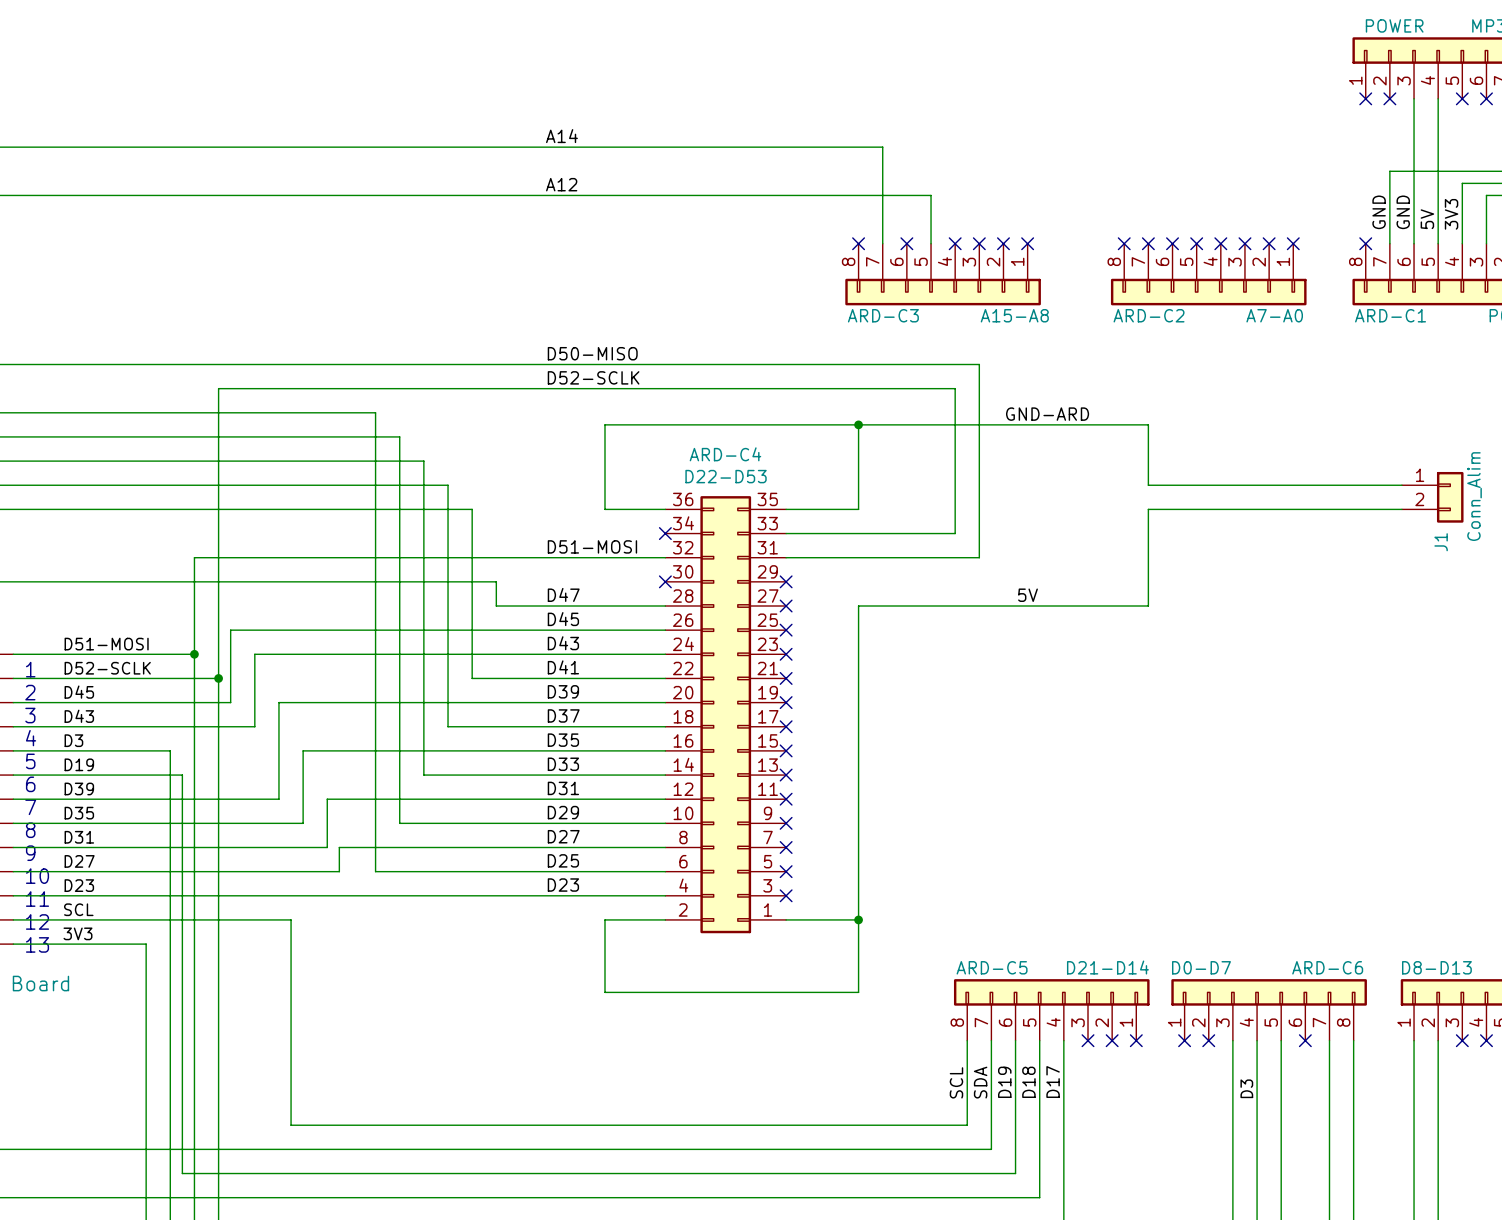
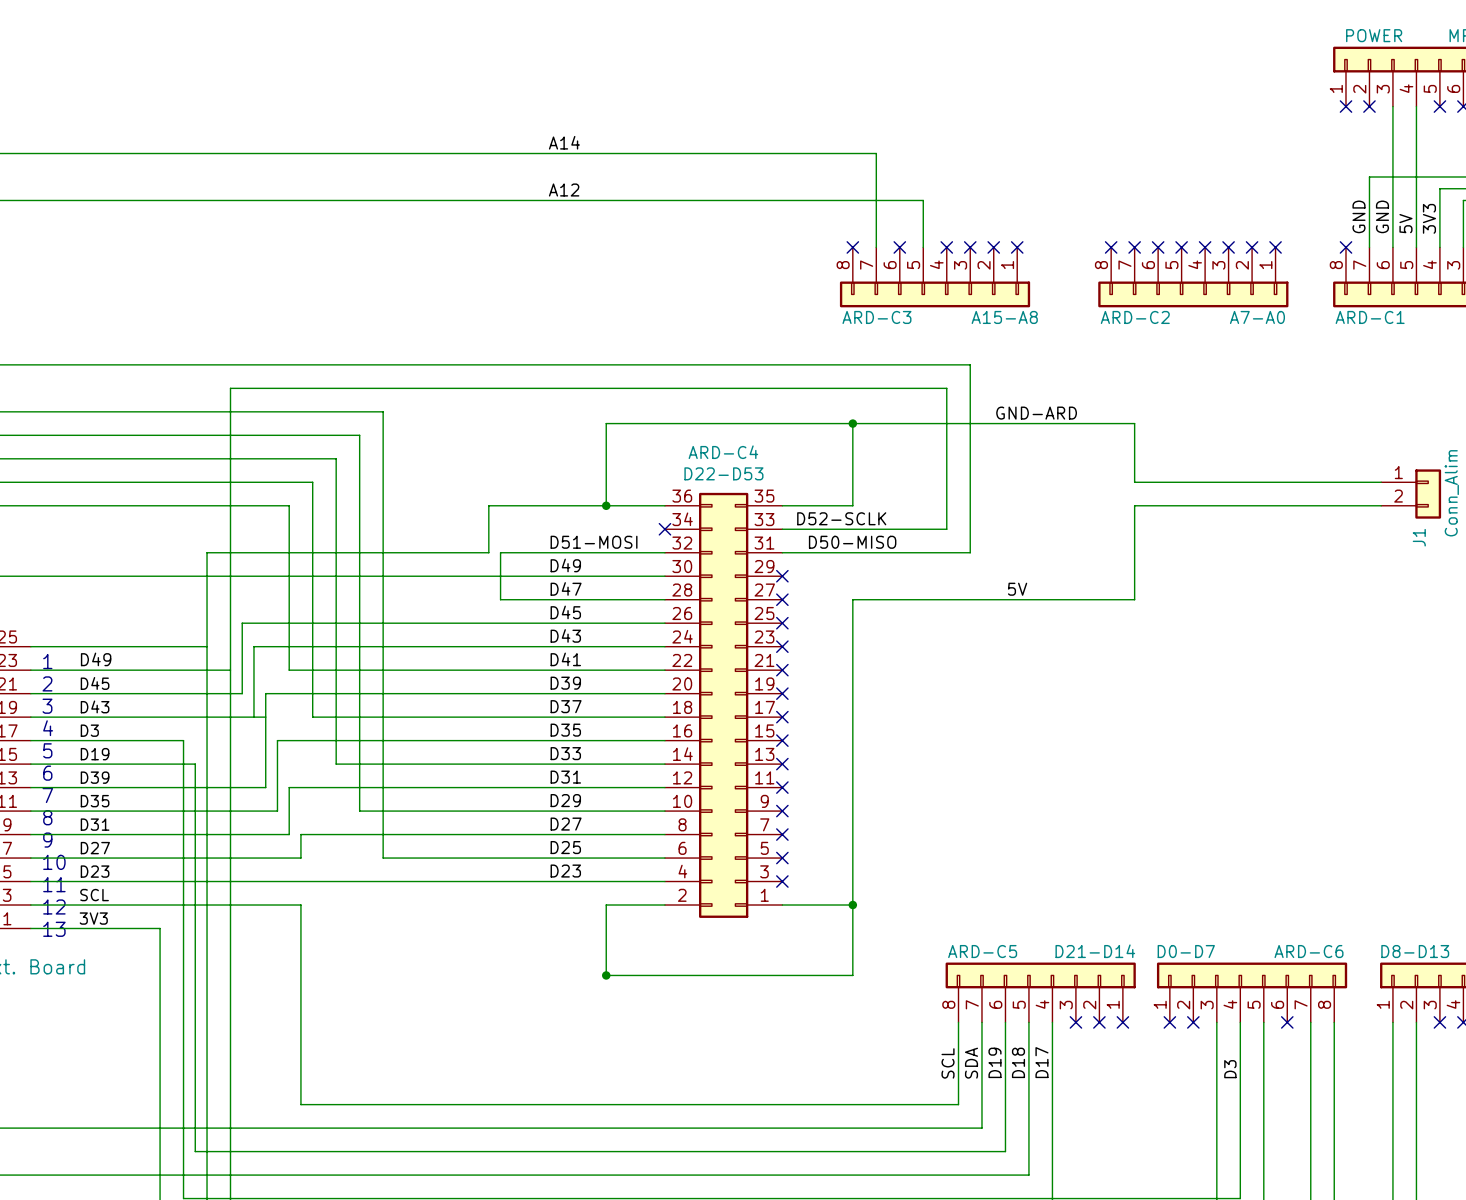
label: D50-MISO (592, 353) -> none
label: D52-SCLK (593, 377) -> none
wire: (351, 436) (399, 436) (399, 823) -> (359, 435) (359, 811) (406, 811)
wire: (327, 461) (423, 461) (423, 775) -> (336, 458) (336, 764) (430, 764)
wire: (303, 485) (448, 485) (448, 726) -> (312, 482) (312, 717) (453, 717)
wire: (278, 509) (472, 509) (472, 678) -> (289, 505) (289, 670) (477, 670)
junction: none -> (606, 505)
label: none -> D52-SCLK (841, 518)
label: none -> D50-MISO (852, 542)
wire: (484, 557) (496, 557) -> (488, 552) (488, 505) (606, 505)
wire: none -> (500, 552) (500, 576) (664, 576)
label: none -> D49 (565, 565)
no-connect mark: (665, 581) -> none
label: D51-MOSI (106, 644) -> none
junction: (194, 654) -> none
wire: (254, 654) (254, 702) -> (265, 646) (253, 646) (253, 717)
label: D52-SCLK (107, 668) -> D49 (96, 659)
junction: (218, 678) -> none
wire: none -> (265, 693) (289, 693)
wire: (278, 702) (278, 799) (254, 799) -> (265, 717) (265, 787)
wire: (303, 750) (303, 823) (266, 823) -> (312, 740) (277, 740) (277, 811)
wire: (327, 799) (327, 847) -> (336, 787) (289, 787) (289, 834)
wire: (278, 847) (291, 847) -> (300, 858) (300, 834)
wire: (339, 847) (339, 871) (291, 871) -> (347, 834) (336, 834)
junction: none -> (606, 975)

